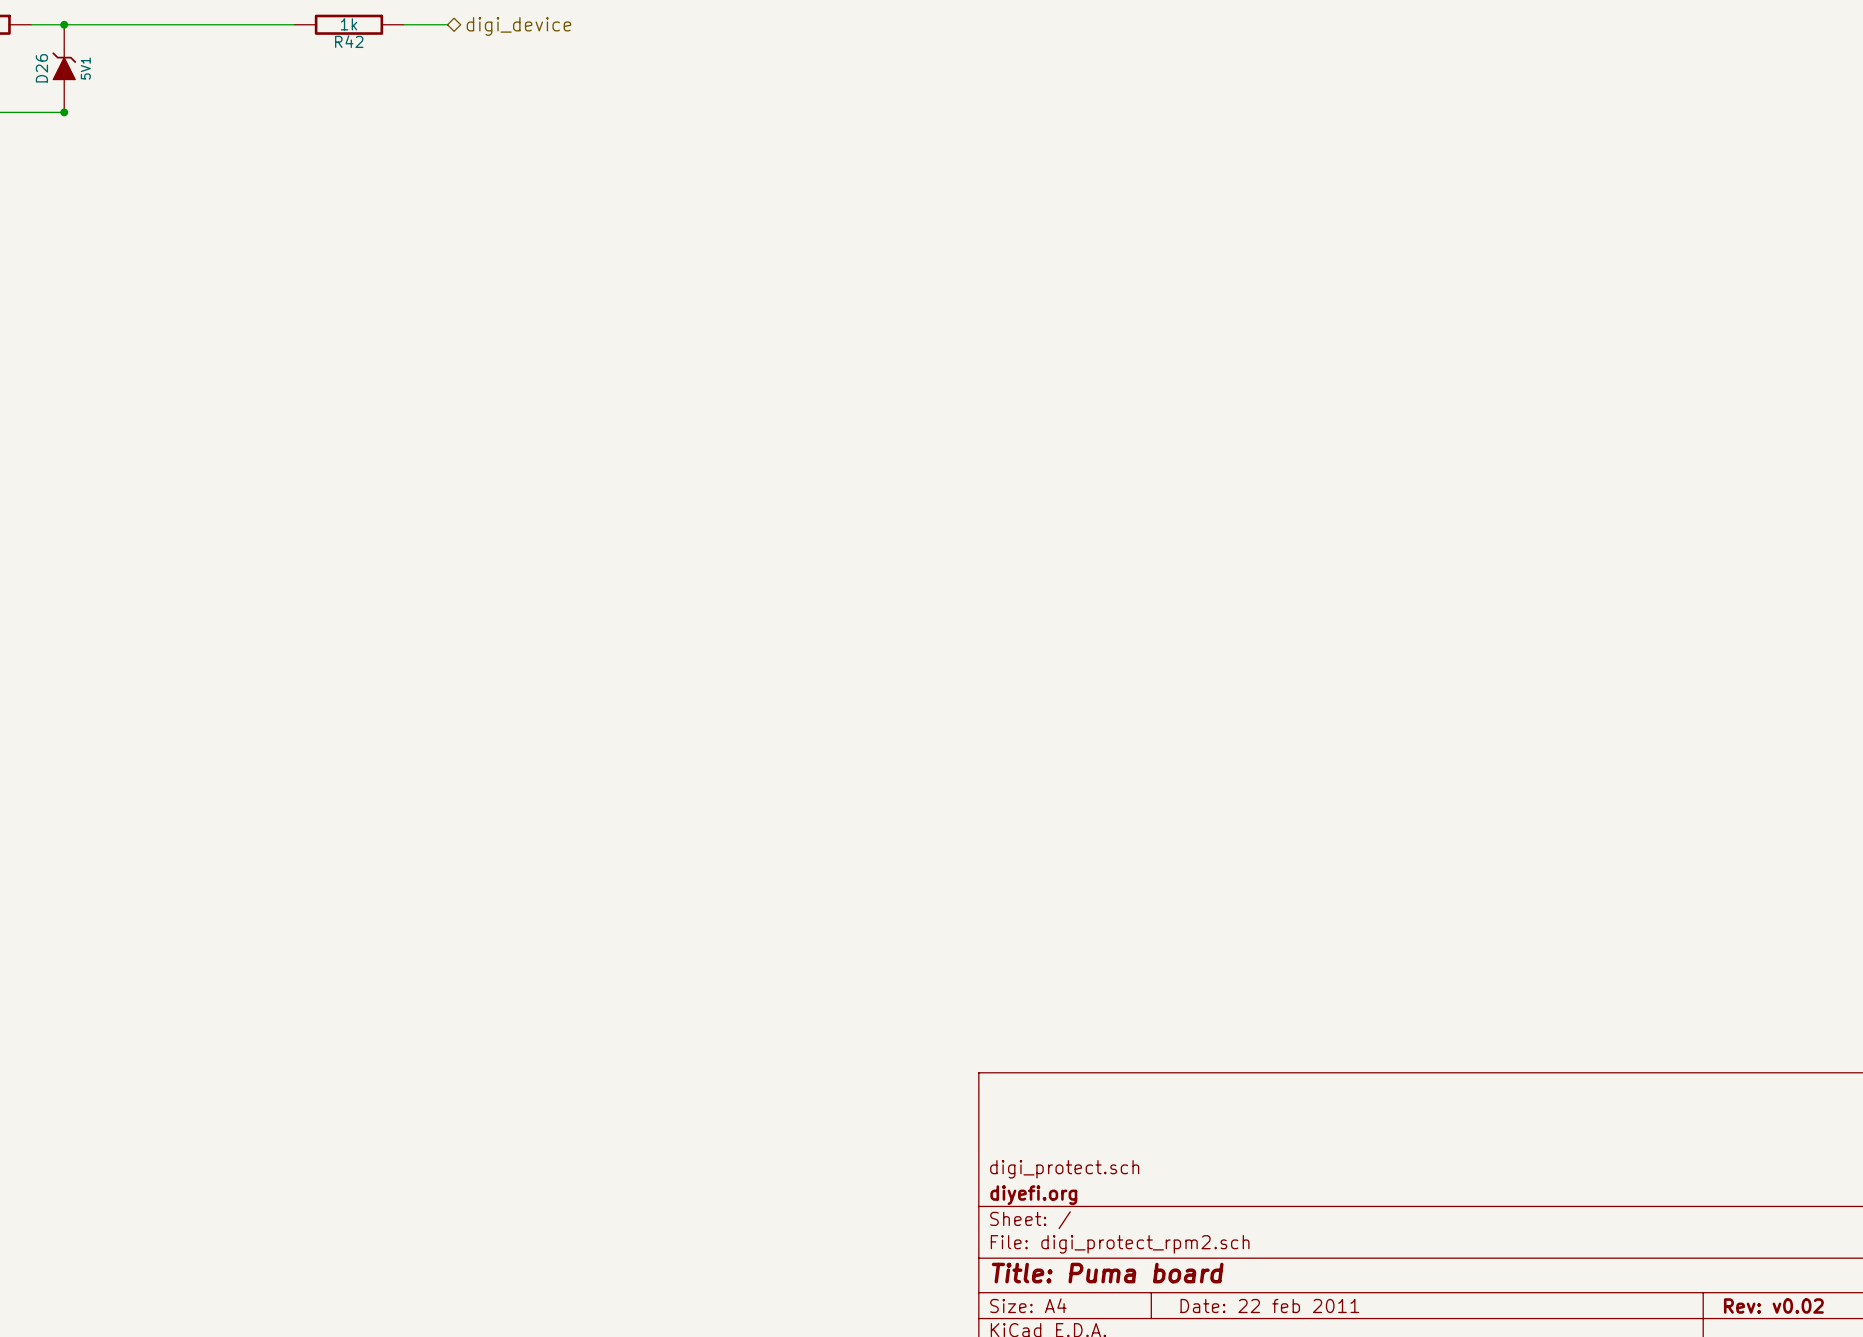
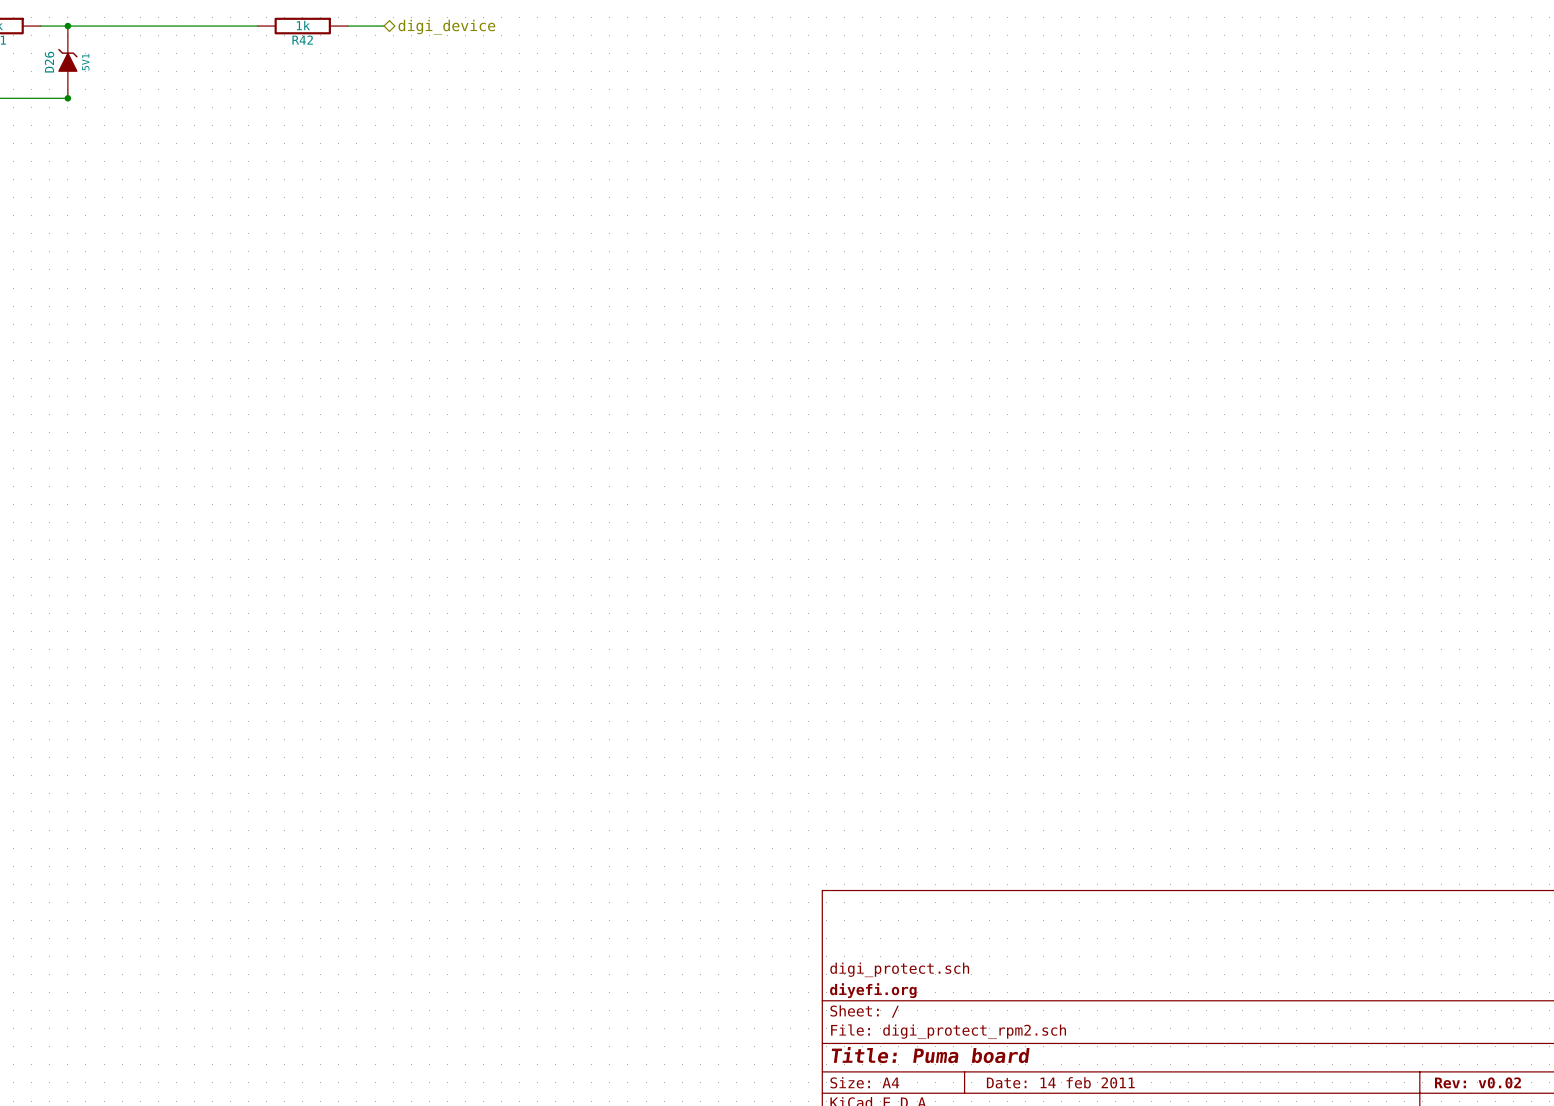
title block: Date: 22 feb 2011 (1269, 1306) -> Date: 14 feb 2011 (1060, 1082)

